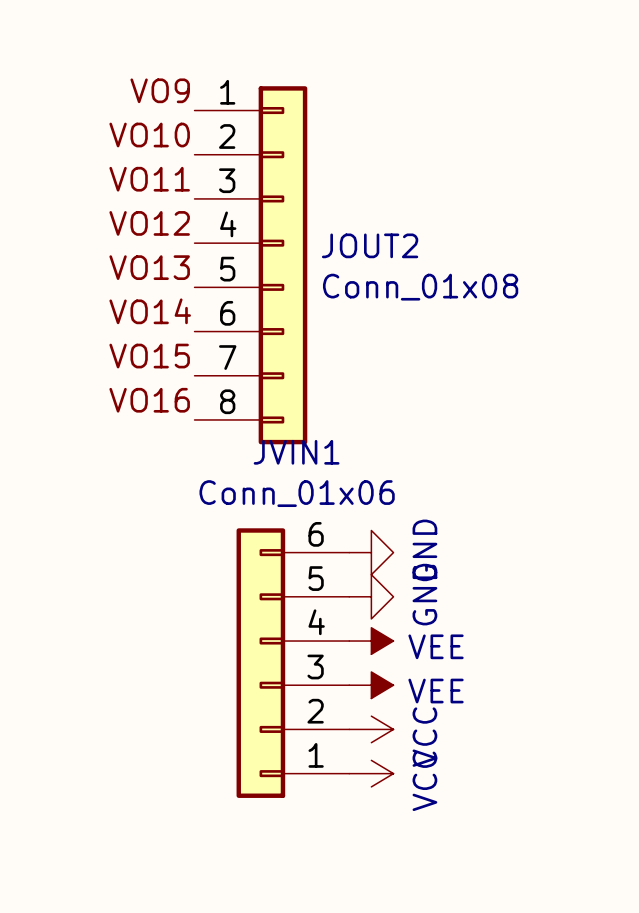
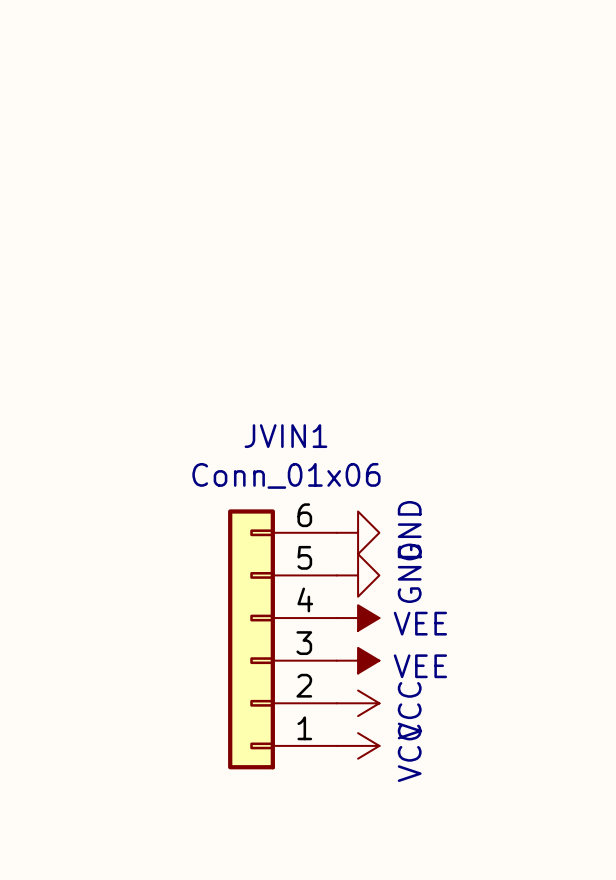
label: VO9 (160, 90) -> none
label: VO10 (149, 135) -> none
label: VO11 (149, 179) -> none
label: VO12 (149, 223) -> none
JOUT2: Conn_01x08 (250, 265) -> none
label: VO13 (149, 267) -> none
label: VO14 (150, 311) -> none
label: VO15 (149, 356) -> none
label: VO16 (149, 400) -> none

